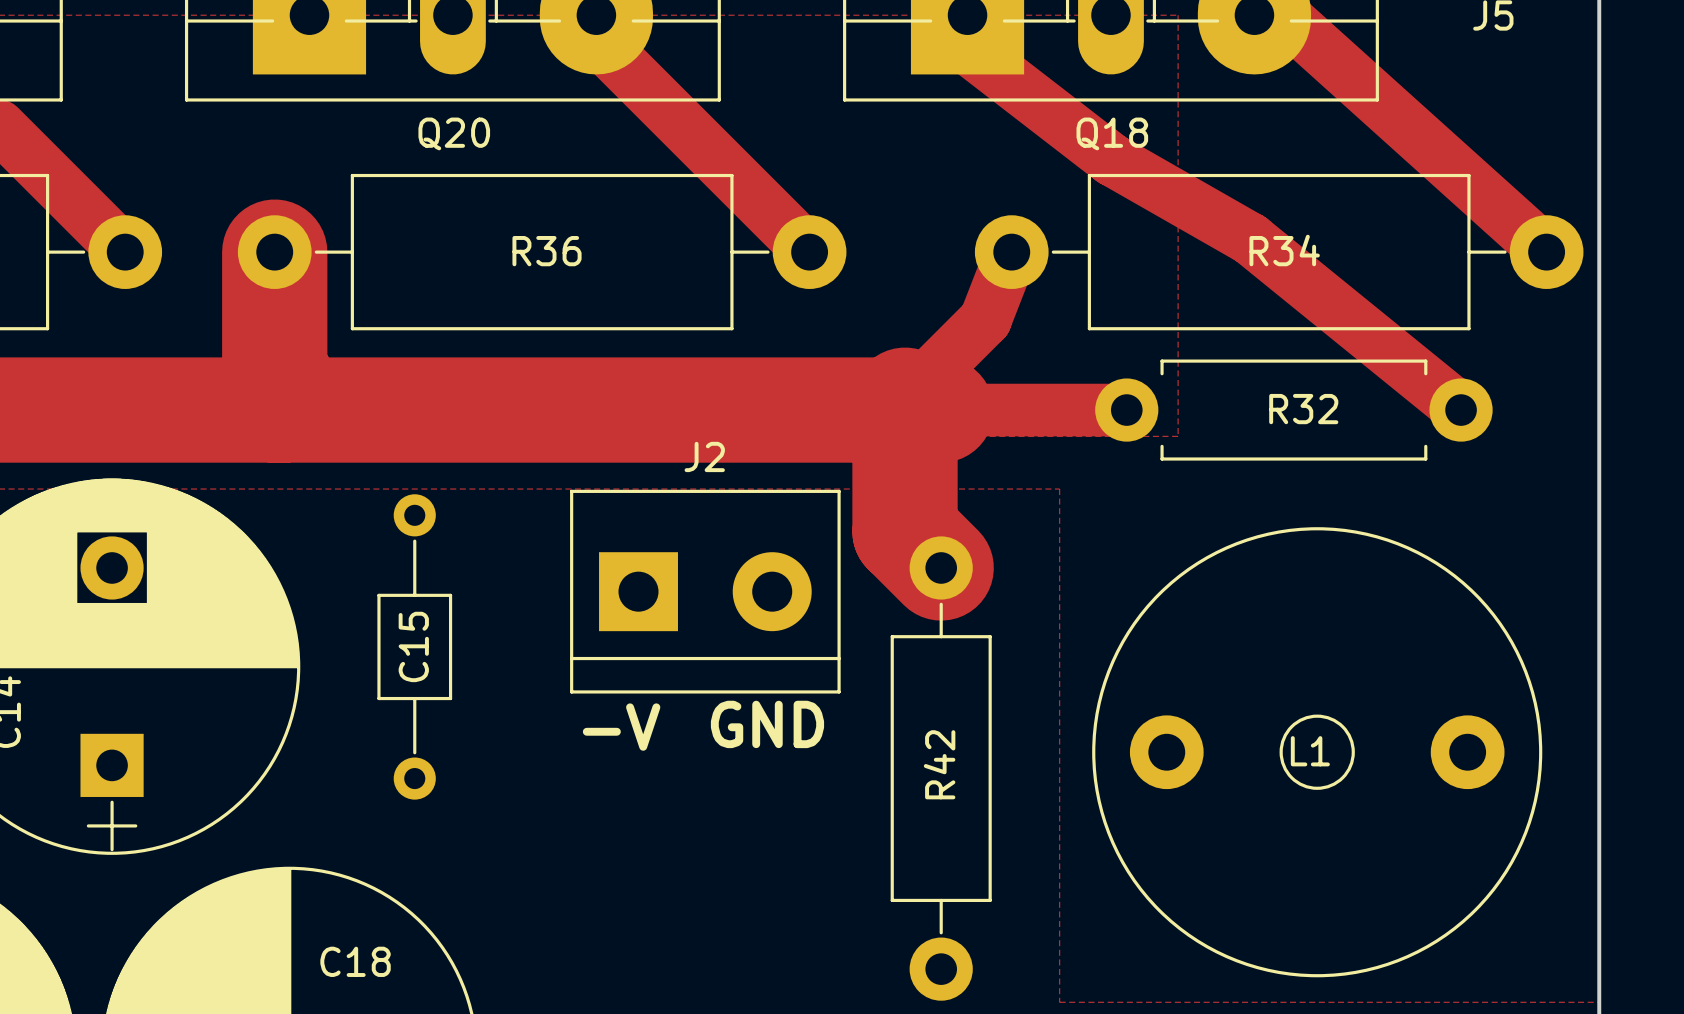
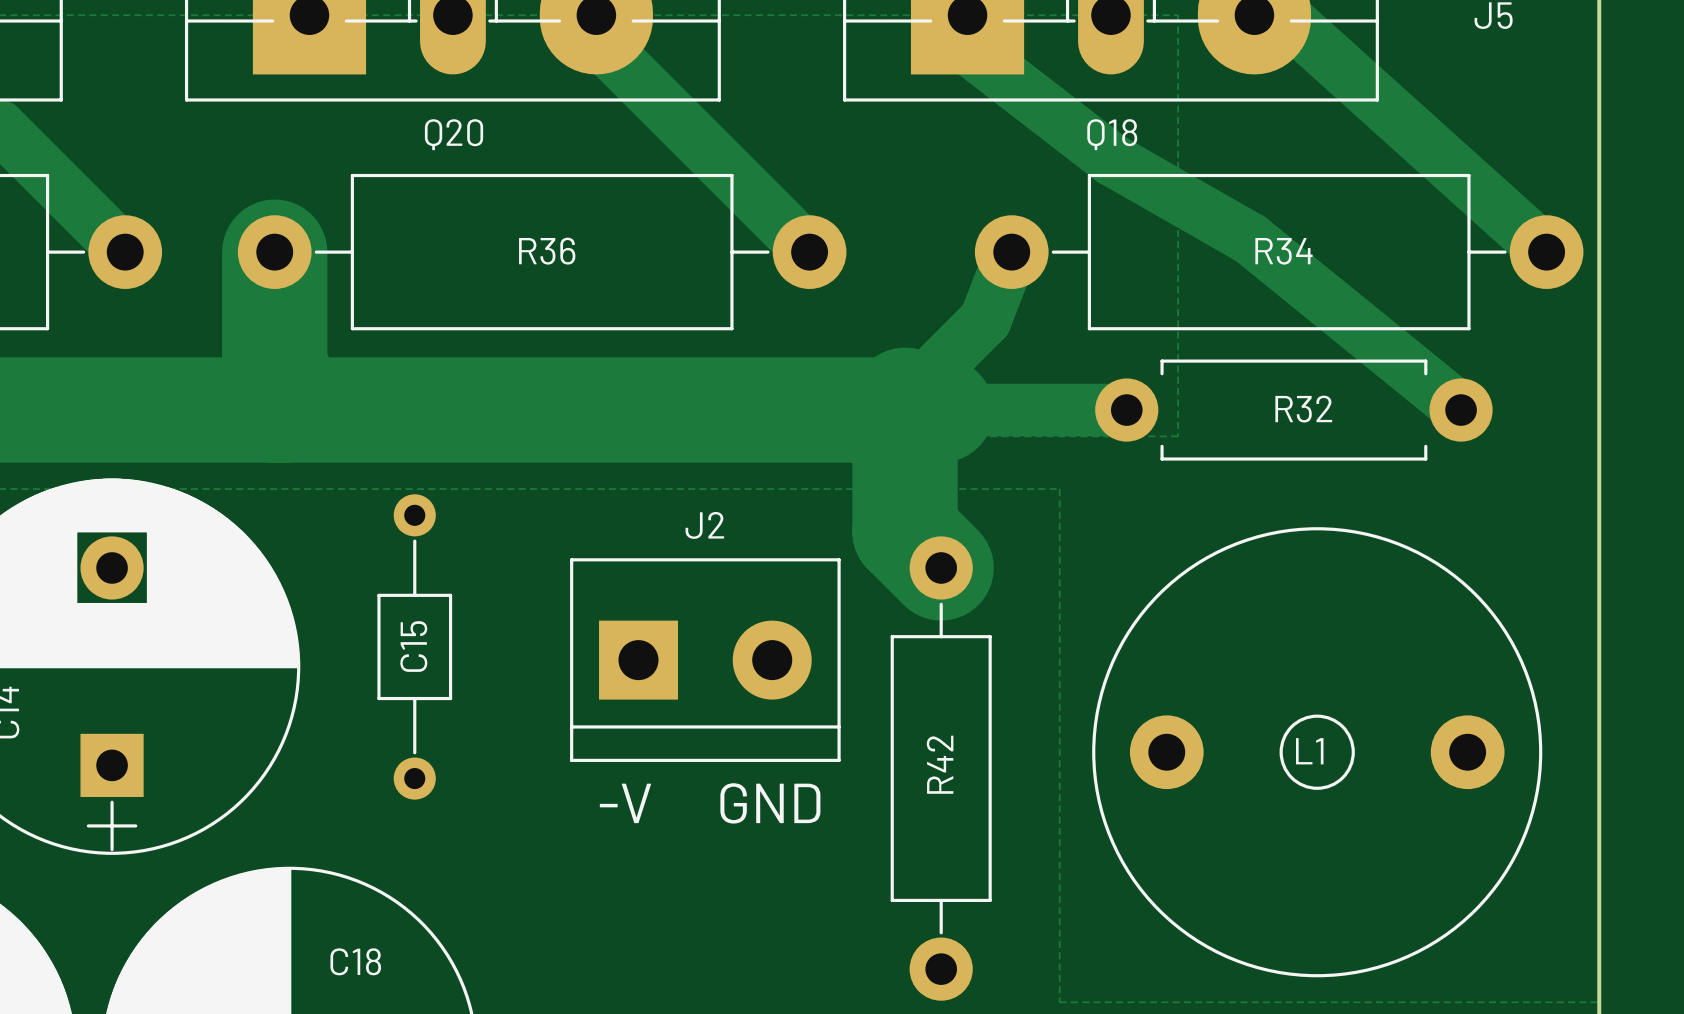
J2 position: (705, 591) -> (705, 660)
text position: GND (767, 724) -> GND (770, 803)
text position: -V (621, 727) -> -V (625, 803)

